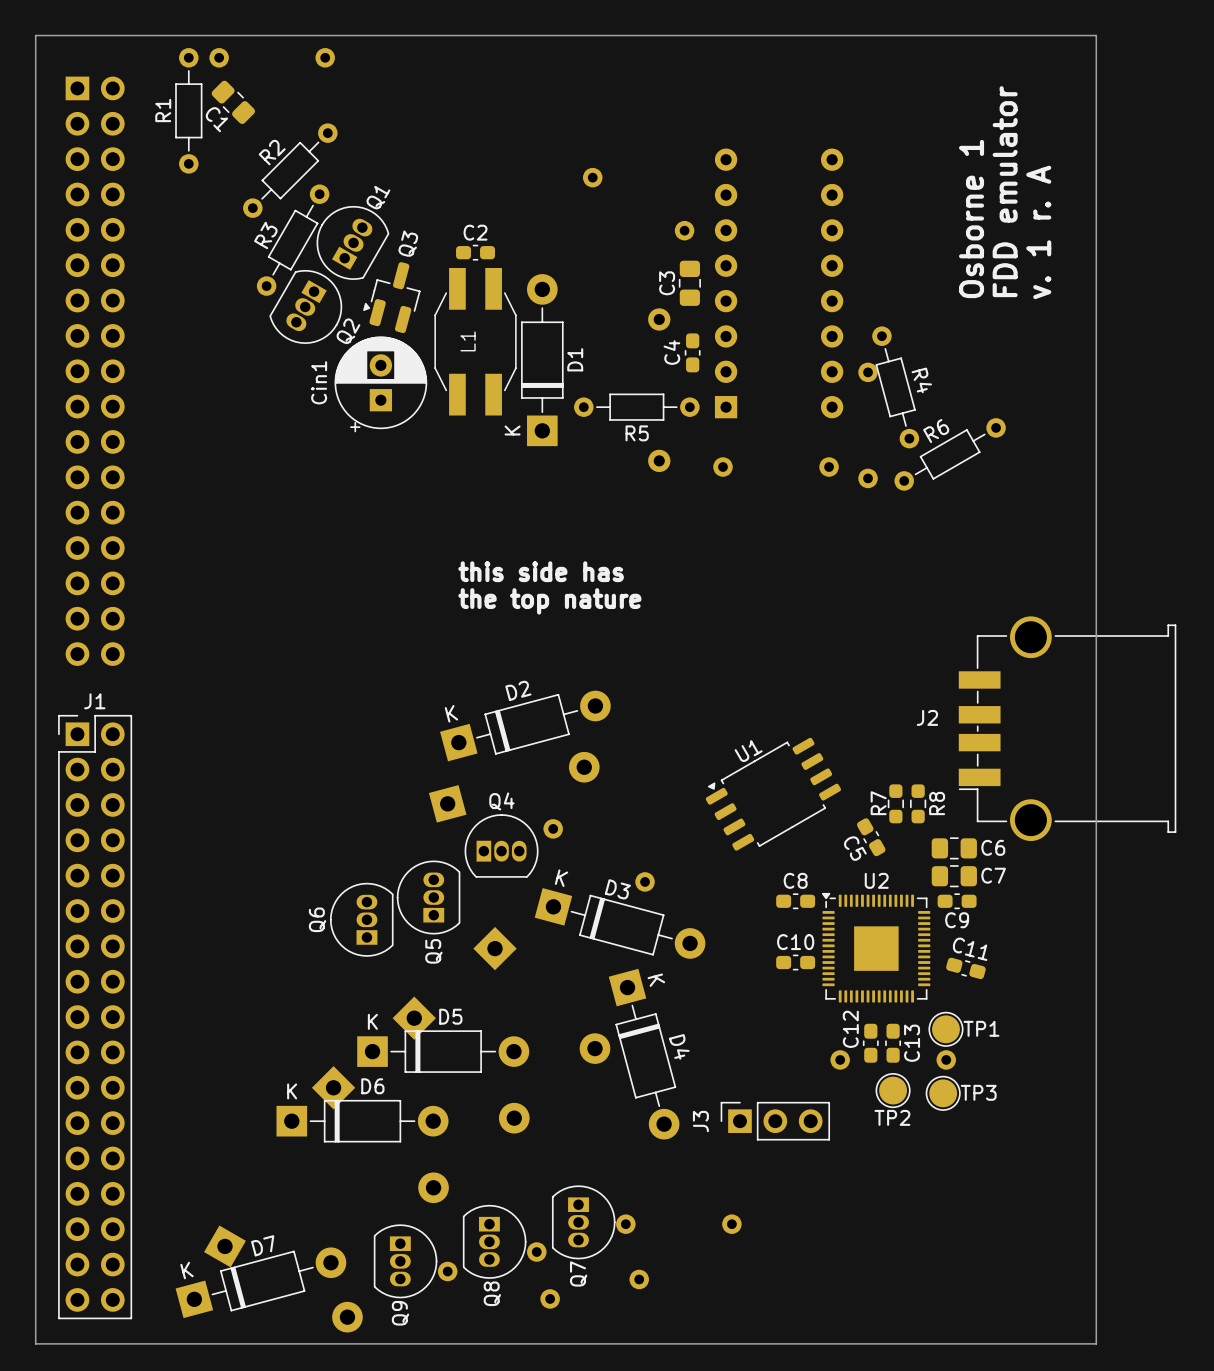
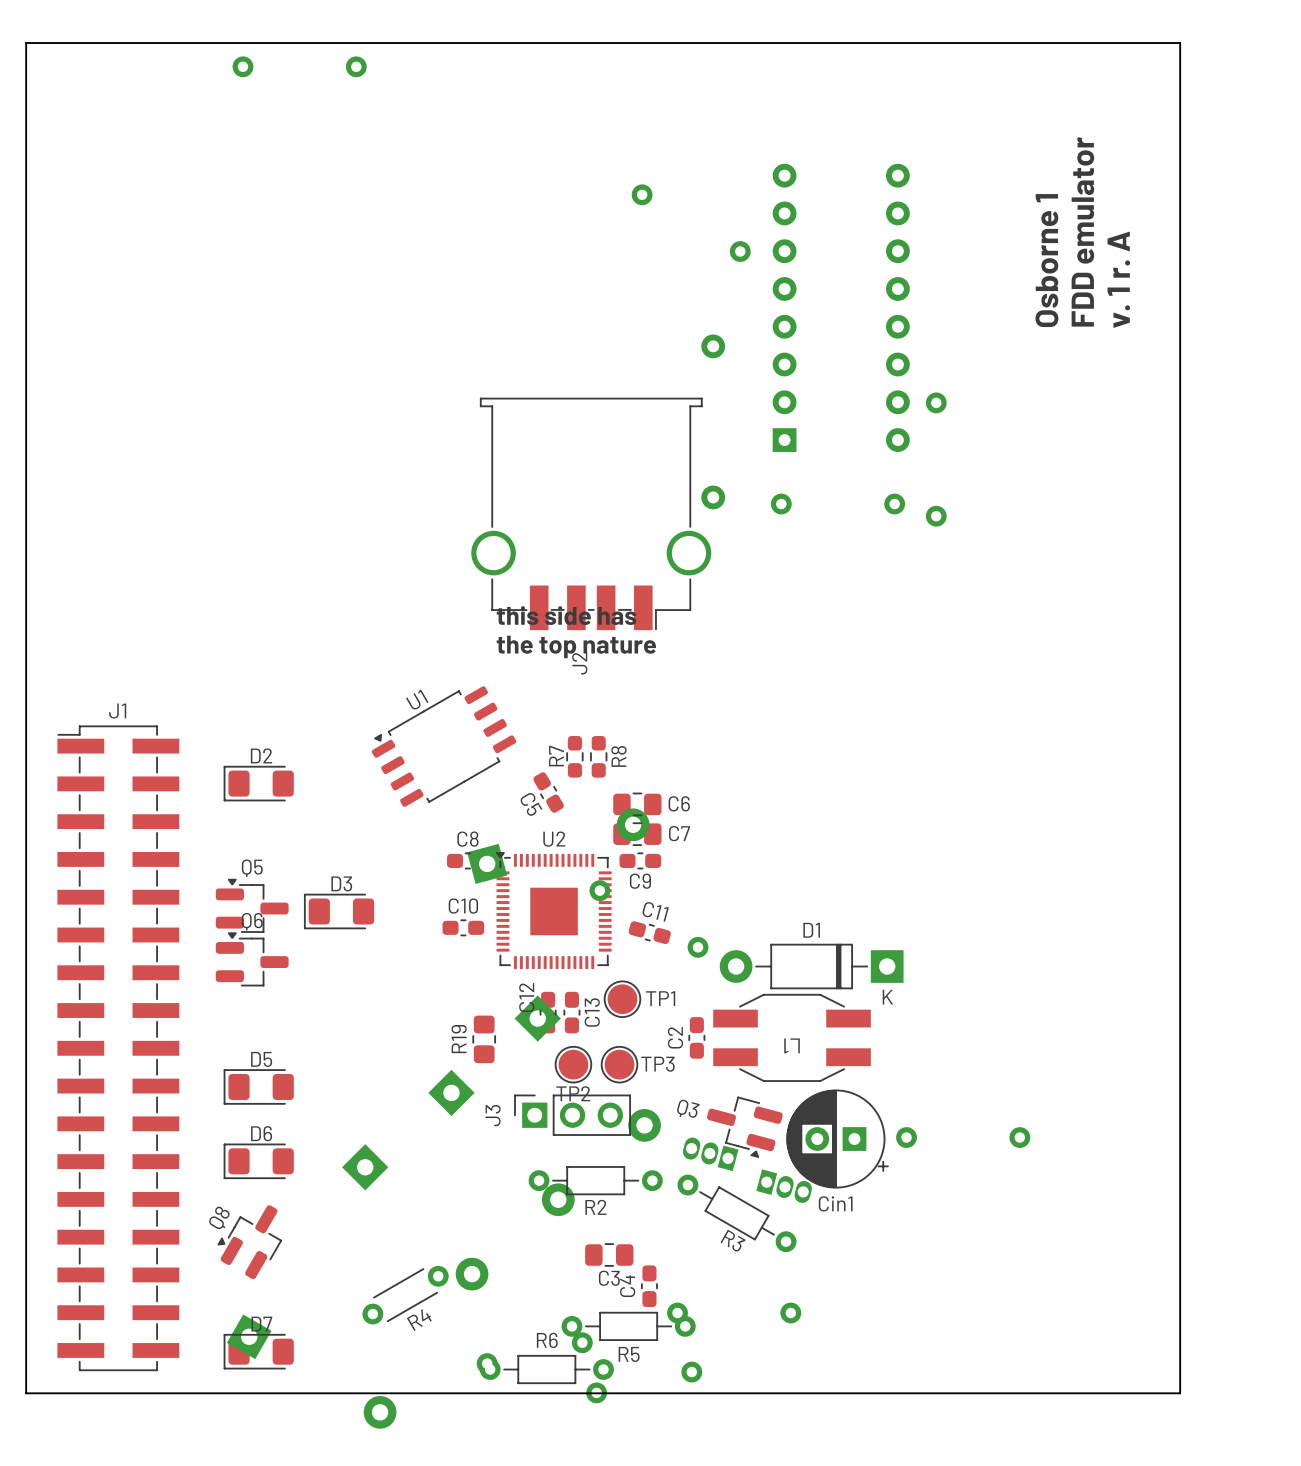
board edge: (35, 35) (35, 1343) (1096, 1343) (1096, 1299) -> (46, 43) (26, 43) (26, 1393) (1180, 1393)
C1: (233, 102) -> none
R1: (188, 110) -> none
R2 name position: R2 (272, 152) -> R2 (595, 1207)
R2 rotation: 0° (290, 170) -> 45° clockwise (595, 1180)
R2 position: (290, 170) -> (595, 1180)
R3 name position: R3 (265, 235) -> R3 (733, 1240)
R3 rotation: 0° (293, 240) -> 90° clockwise (737, 1213)
R3 position: (293, 240) -> (737, 1213)
Q1: (352, 242) -> none
C2 rotation: 0° (475, 252) -> 90° clockwise (696, 1037)
C2 position: (475, 252) -> (696, 1037)
C3 name position: C3 (667, 283) -> C3 (609, 1278)
C3 rotation: 0° (689, 283) -> 90° clockwise (609, 1255)
C3 position: (689, 283) -> (609, 1255)
Q3 rotation: 0° (391, 297) -> 90° counterclockwise (744, 1127)
Q3 position: (391, 297) -> (744, 1127)
Q2: (305, 306) -> none
R4 footprint: [872, 326, 920, 449] -> [362, 1265, 449, 1325]
L1 rotation: 0° (475, 341) -> 90° clockwise (792, 1037)
L1 position: (475, 341) -> (792, 1037)
C4 position: (692, 352) -> (649, 1286)
D1 rotation: 0° (542, 360) -> 90° counterclockwise (811, 966)
D1 position: (542, 360) -> (811, 966)
part: (95, 371) -> none
R4 name position: R4 (921, 380) -> R4 (419, 1320)
Cin1 rotation: 0° (380, 384) -> 90° counterclockwise (837, 1139)
Cin1 position: (380, 384) -> (837, 1139)
R5 position: (636, 407) -> (628, 1326)
R6 rotation: 0° (950, 454) -> 30° clockwise (546, 1369)
R6 position: (950, 454) -> (546, 1369)
D2 footprint: [440, 690, 611, 762] -> [223, 765, 294, 802]
J1 footprint: [58, 714, 133, 1320] -> [57, 725, 180, 1372]
J2 rotation: 0° (1067, 728) -> 90° counterclockwise (591, 513)
J2 position: (1067, 728) -> (591, 513)
U1 position: (773, 794) -> (444, 746)
R7 position: (895, 803) -> (574, 756)
R8 position: (918, 803) -> (598, 756)
C5 position: (871, 837) -> (548, 792)
Q4: (501, 845) -> none
C6 position: (954, 848) -> (637, 804)
Q5 footprint: [396, 860, 461, 935] -> [215, 878, 289, 933]
C7 position: (954, 876) -> (637, 834)
Q6 footprint: [329, 882, 394, 957] -> [215, 932, 289, 987]
D3 footprint: [534, 888, 706, 959] -> [303, 893, 375, 930]
C8 position: (795, 901) -> (467, 860)
C9 position: (957, 901) -> (640, 860)
Q6 name position: Q6 (317, 919) -> Q6 (252, 921)
U2 position: (876, 947) -> (553, 910)
Q5 name position: Q5 (433, 951) -> Q5 (252, 868)
C10 position: (795, 962) -> (463, 927)
R19: none -> (484, 1039)
C11 position: (965, 968) -> (649, 932)
TP1 position: (945, 1029) -> (622, 999)
D5 footprint: [357, 1030, 530, 1073] -> [223, 1069, 294, 1105]
C12 position: (870, 1043) -> (548, 1012)
C13 position: (893, 1043) -> (571, 1012)
D4: (644, 1054) -> none
part: none -> (710, 1154)
TP2 position: (893, 1090) -> (573, 1064)
TP3 position: (943, 1093) -> (619, 1064)
D6 footprint: [276, 1099, 449, 1143] -> [223, 1143, 294, 1180]
part: none -> (784, 1186)
J3 position: (775, 1121) -> (572, 1115)
Q8 footprint: [462, 1204, 527, 1279] -> [217, 1205, 283, 1280]
Q7: (583, 1222) -> none
D7 footprint: [175, 1247, 347, 1319] -> [223, 1333, 294, 1370]
Q9: (405, 1261) -> none
Q8 name position: Q8 (492, 1293) -> Q8 (219, 1218)

